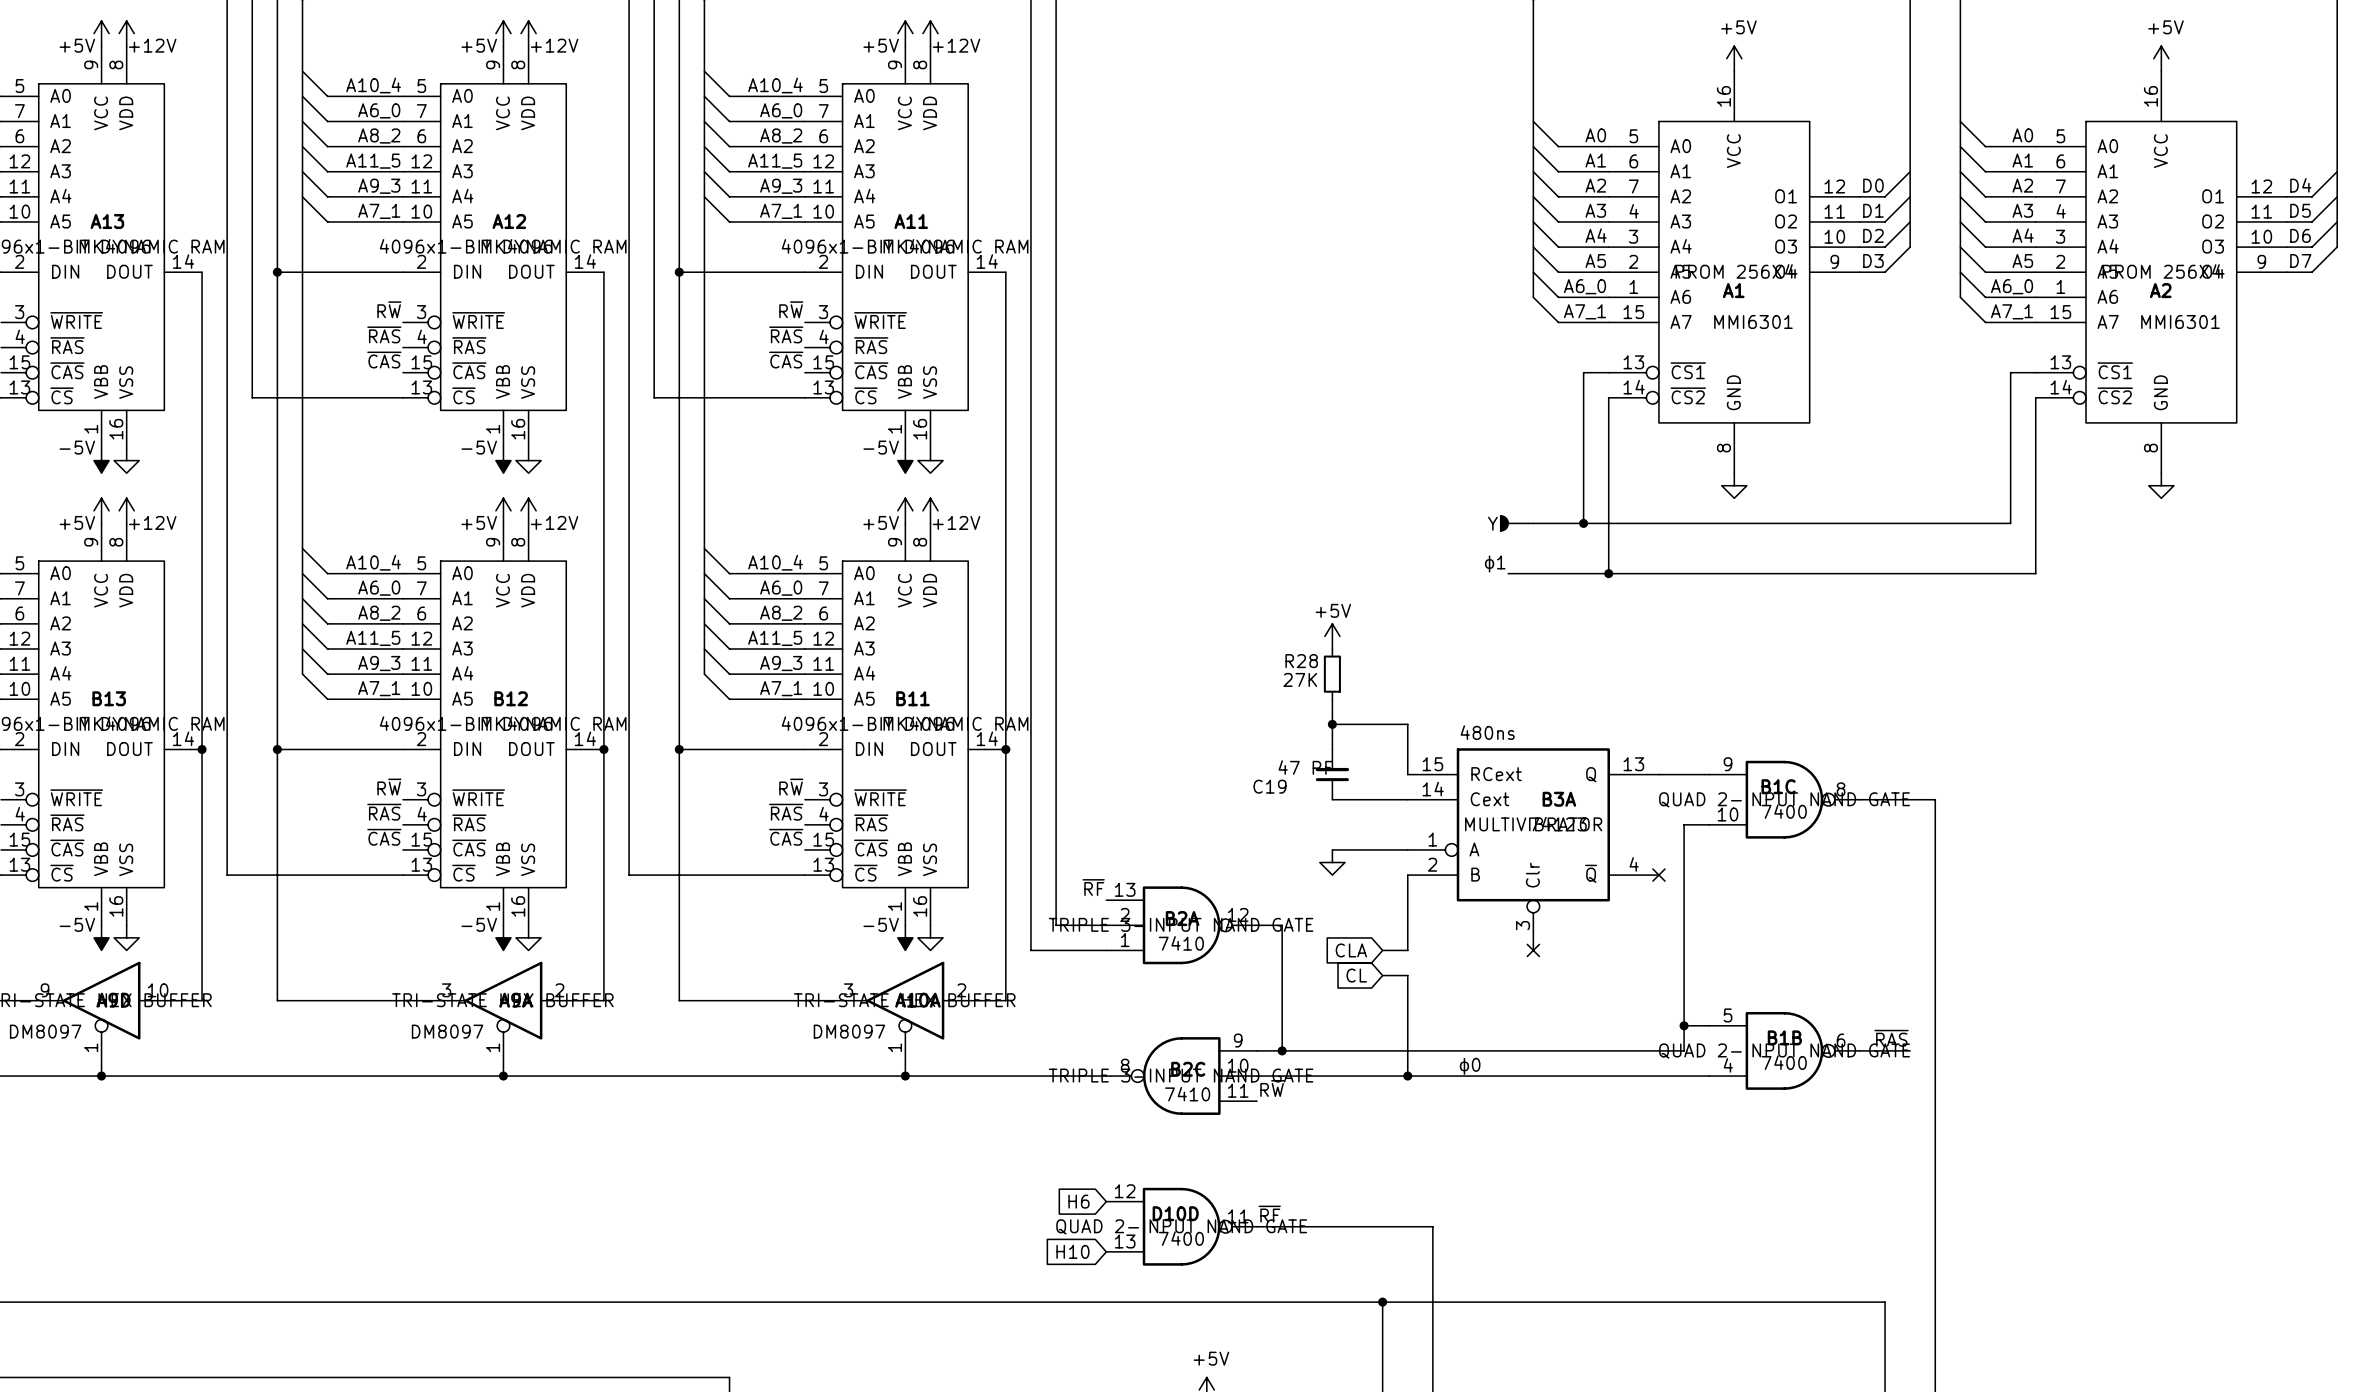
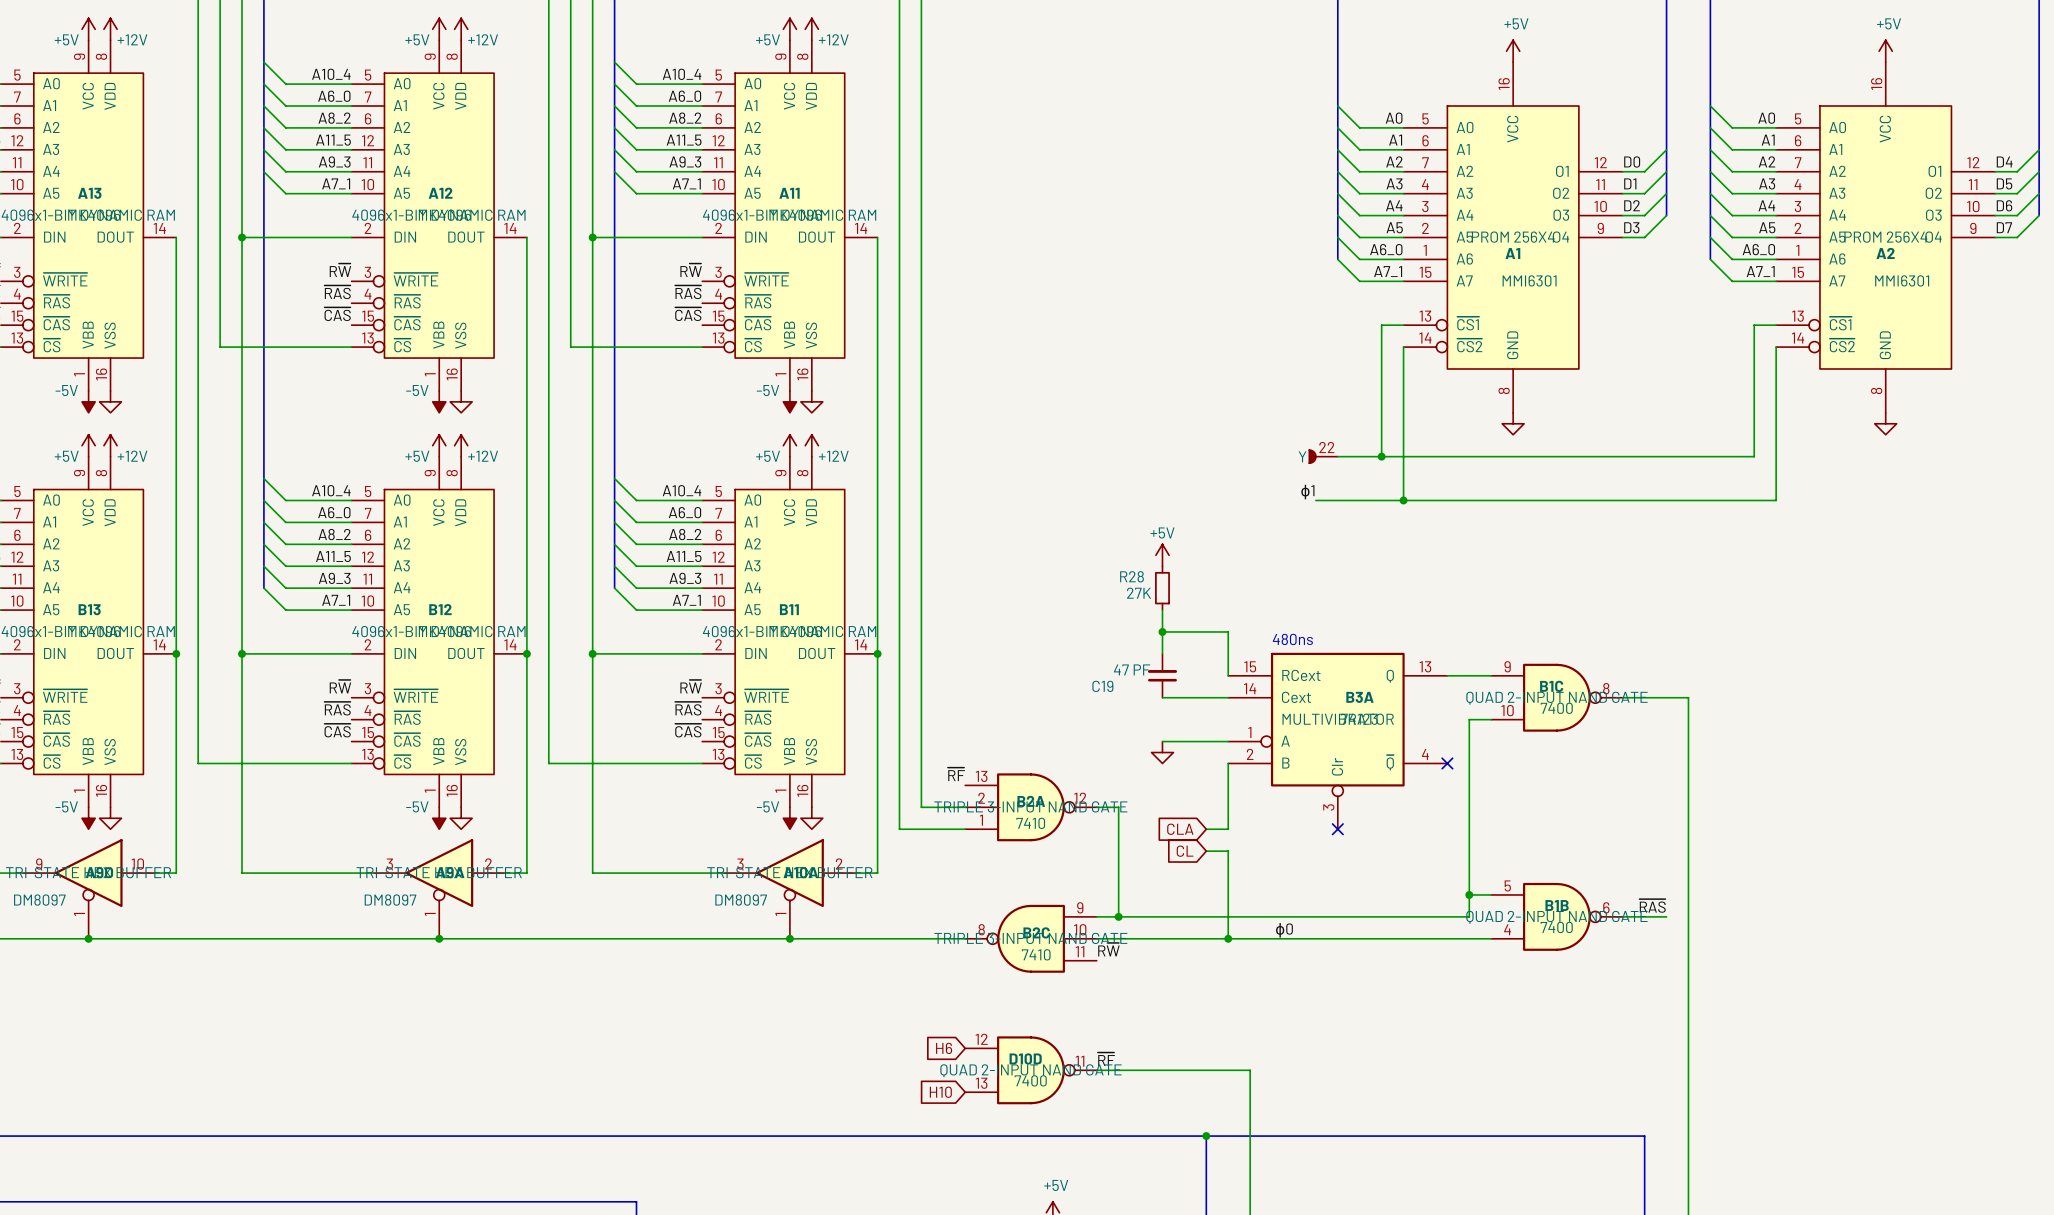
part pin number: none -> 22 (1326, 447)

